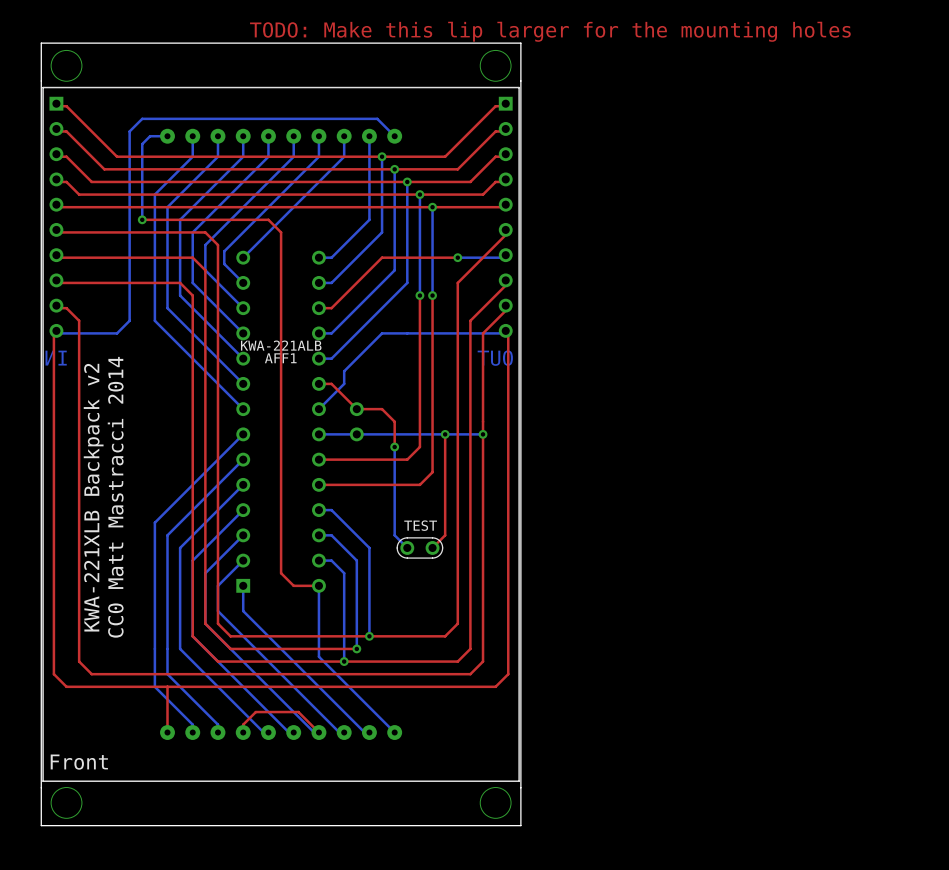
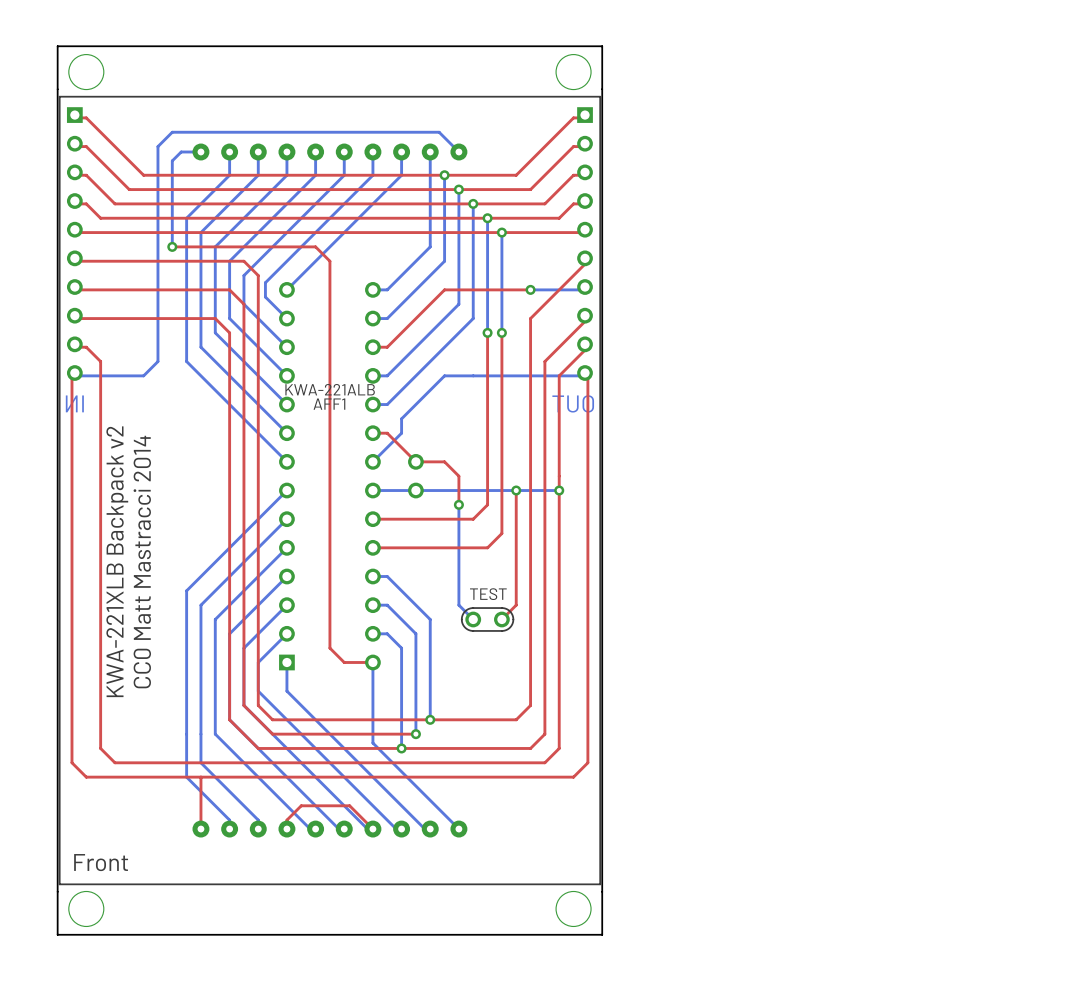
text: TODO: Make this lip larger for the mounting holes (550, 31) -> none

